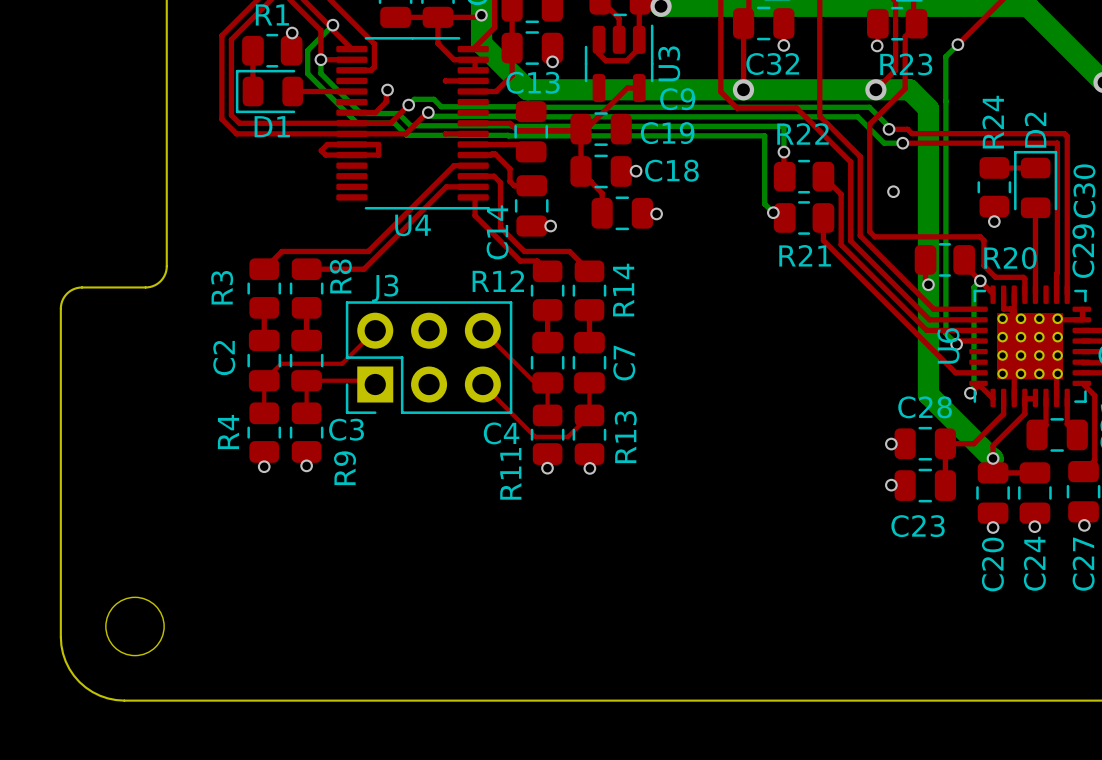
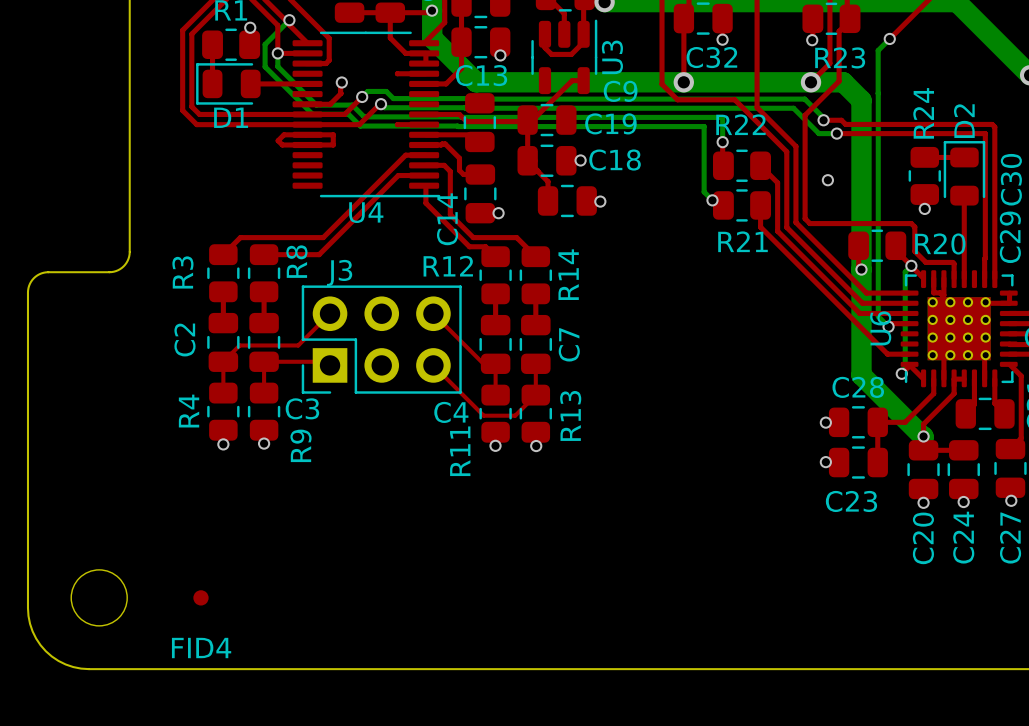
FID4: none -> (200, 597)

